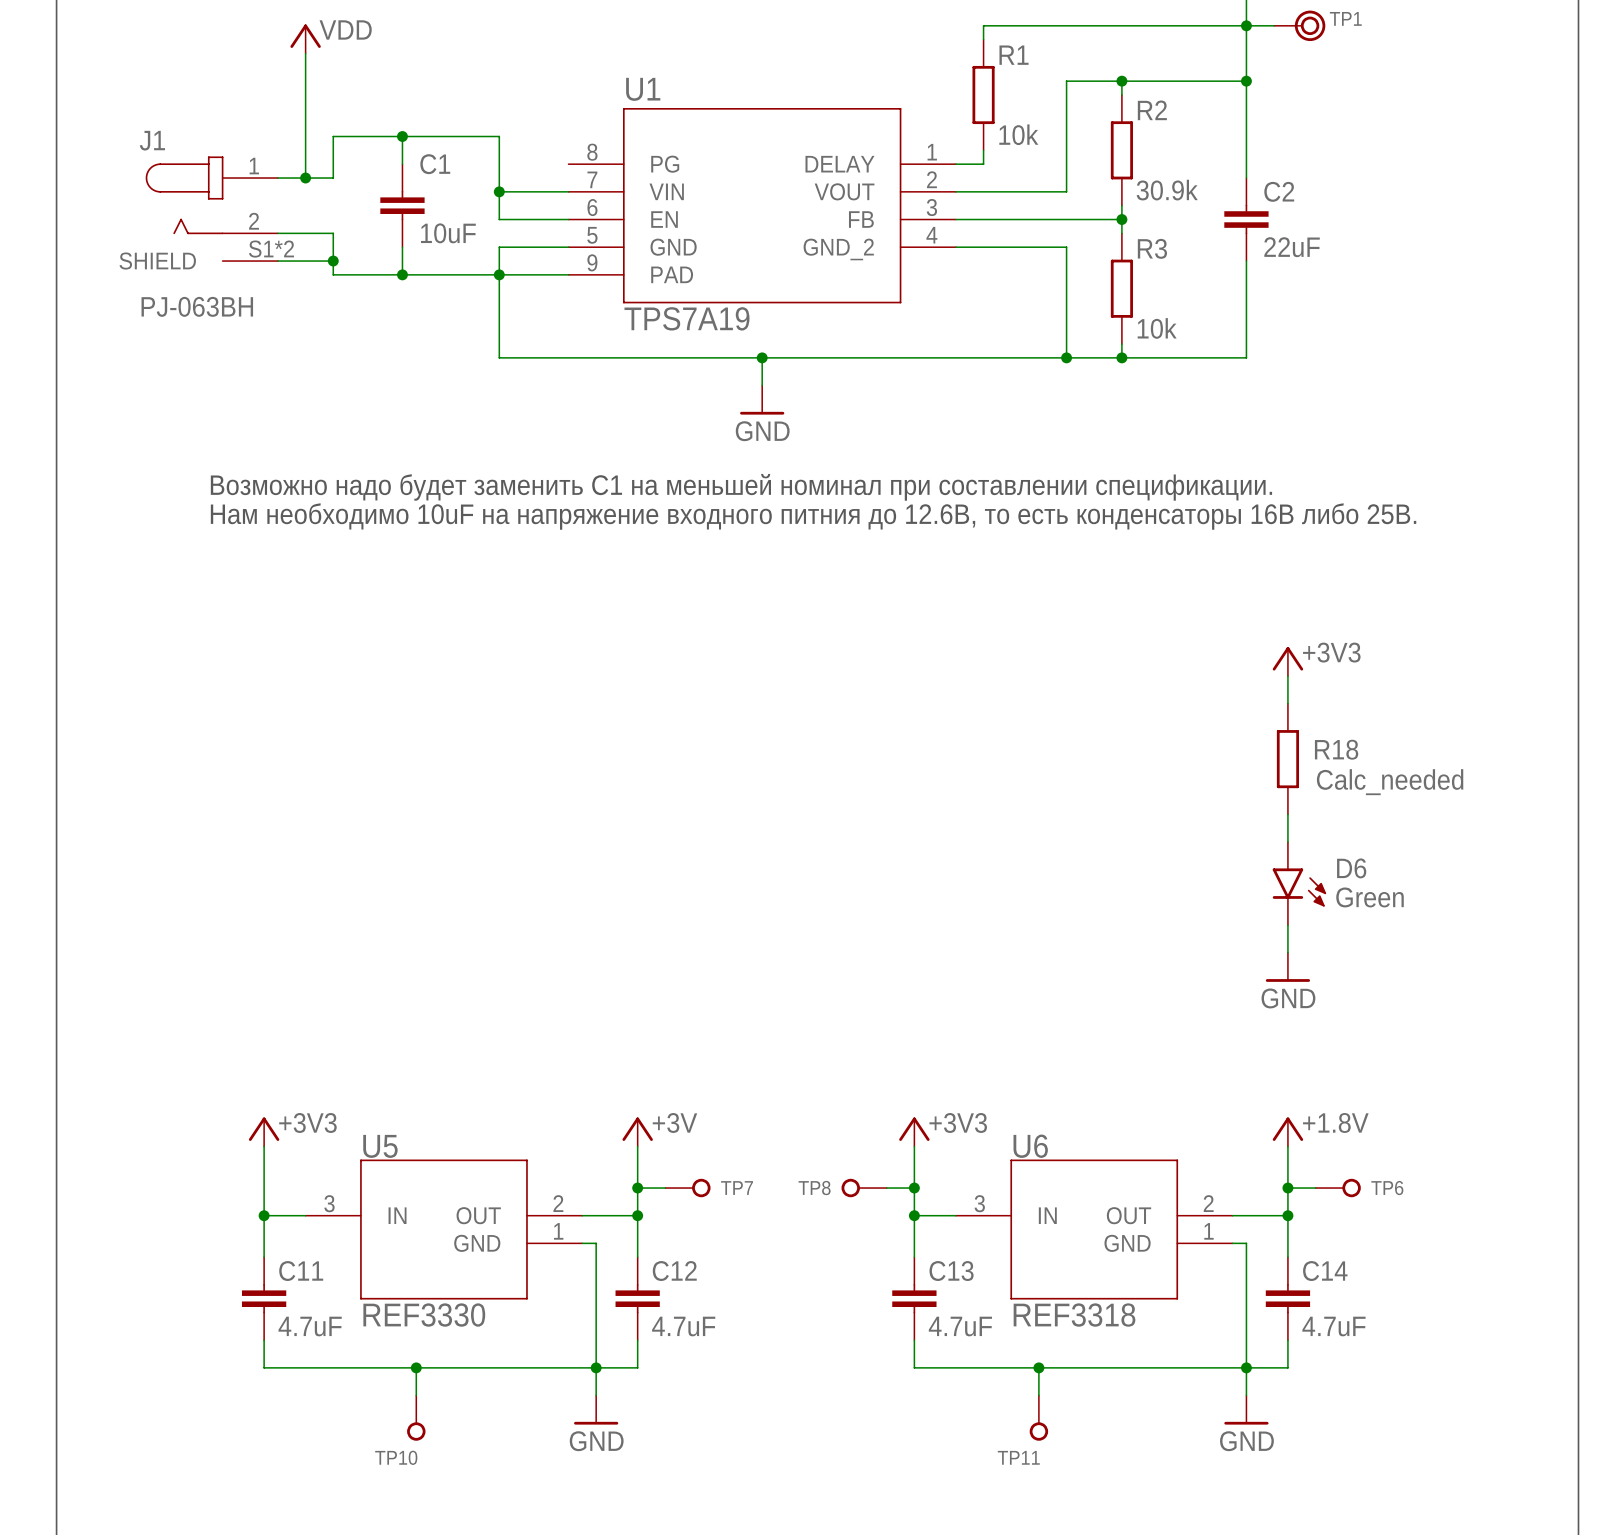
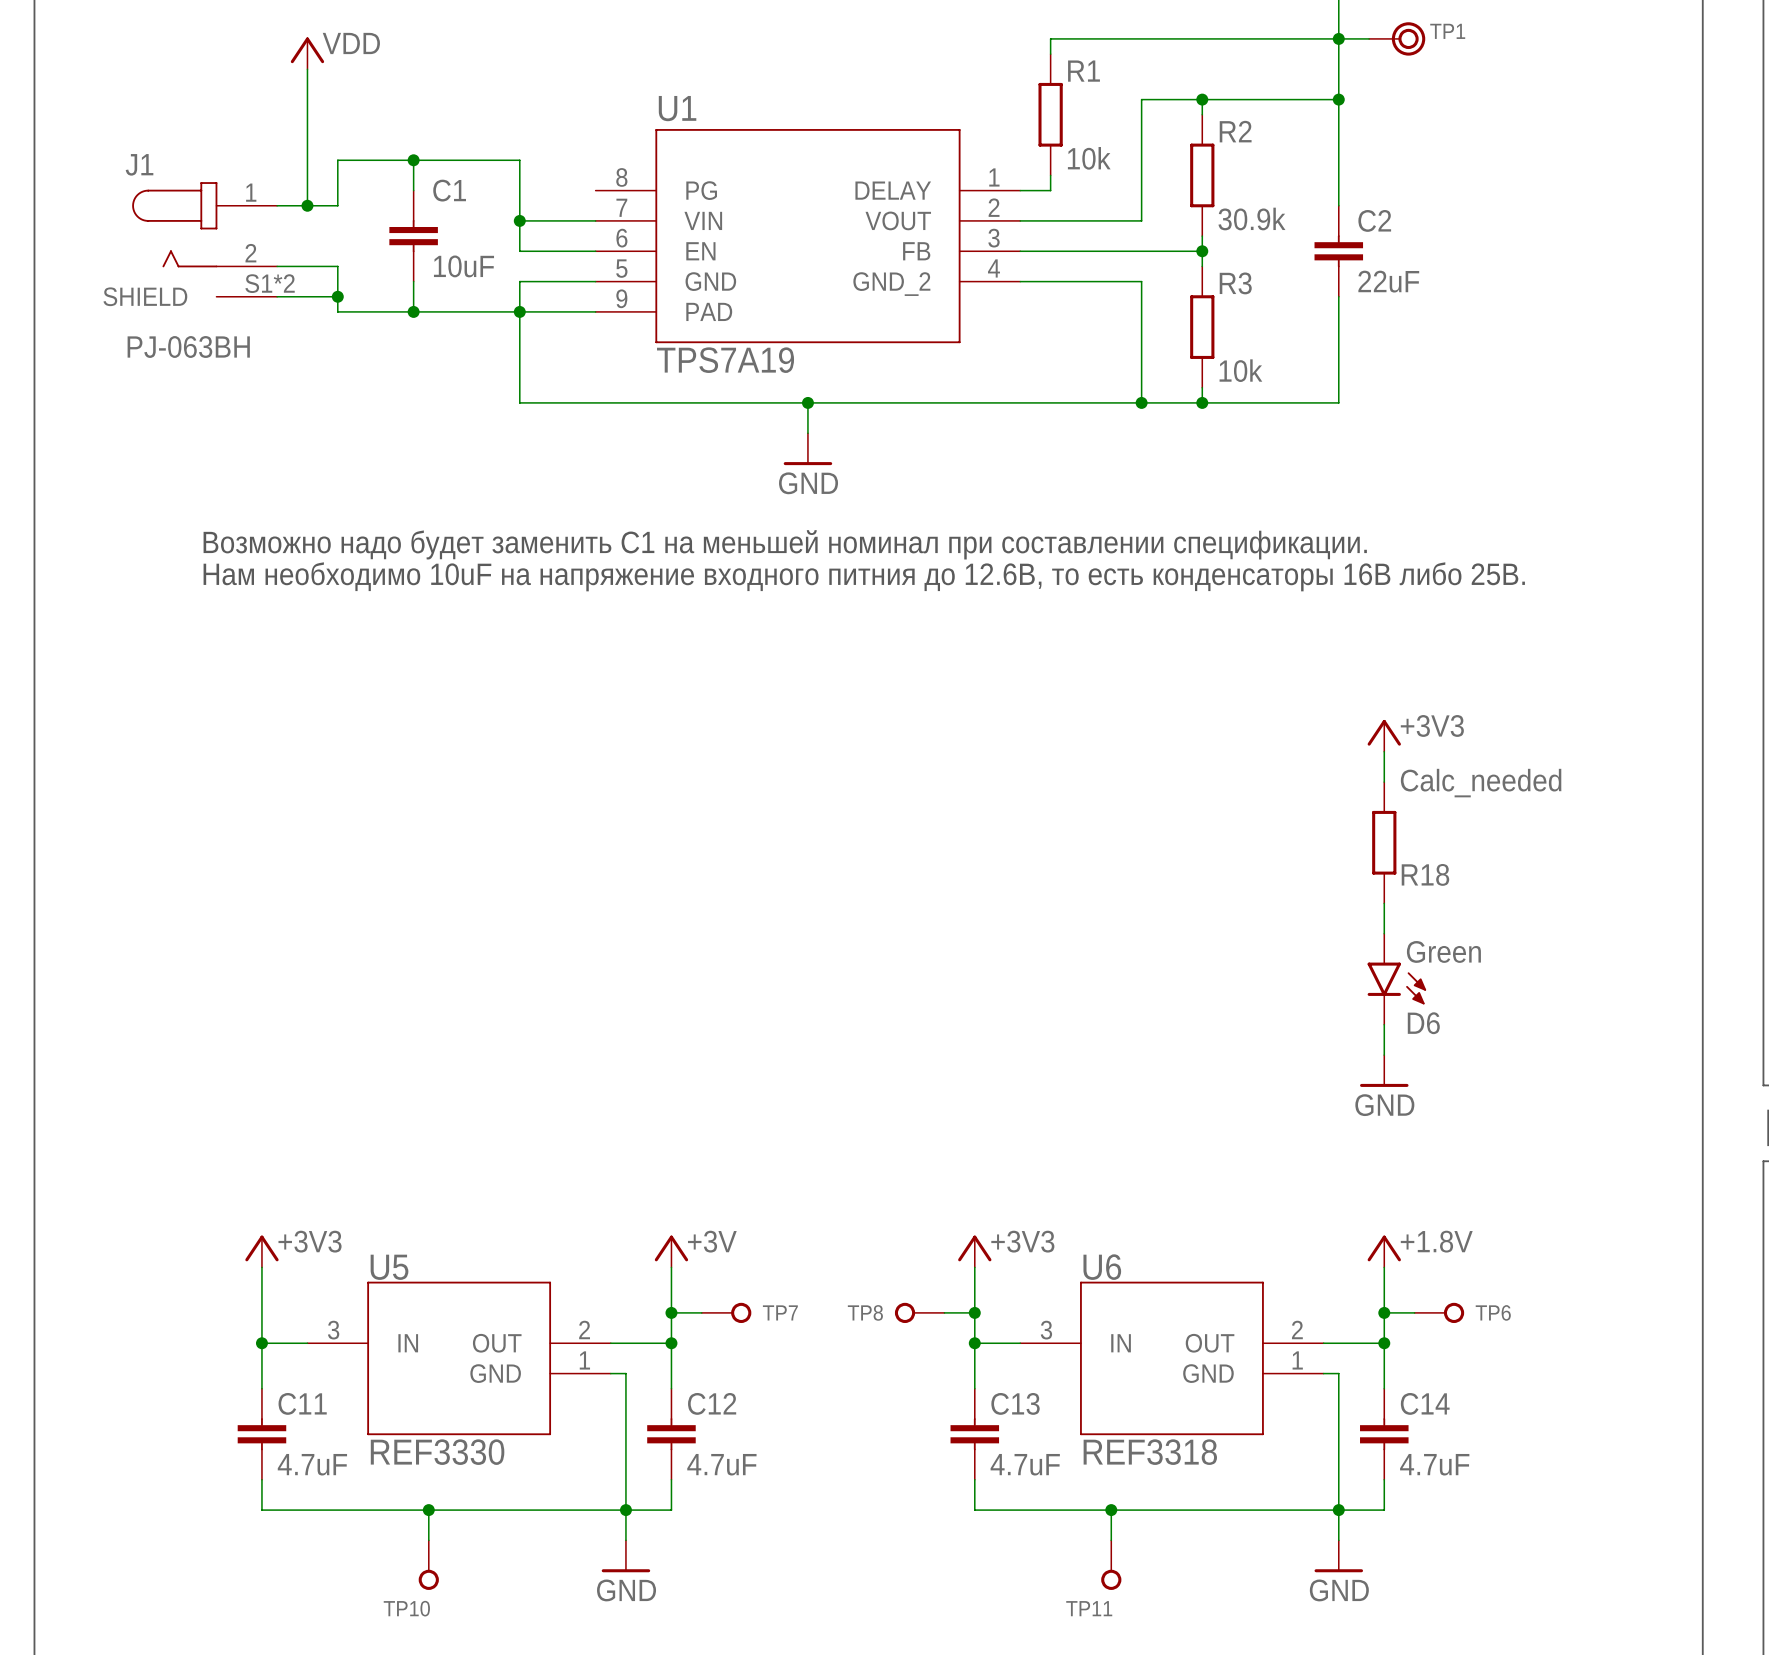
R18 name position: R18 (1336, 749) -> R18 (1425, 874)
R18 value position: Calc_needed (1390, 782) -> Calc_needed (1481, 783)
D6 name position: D6 (1351, 868) -> D6 (1423, 1023)
D6 value position: Green (1370, 897) -> Green (1443, 951)

